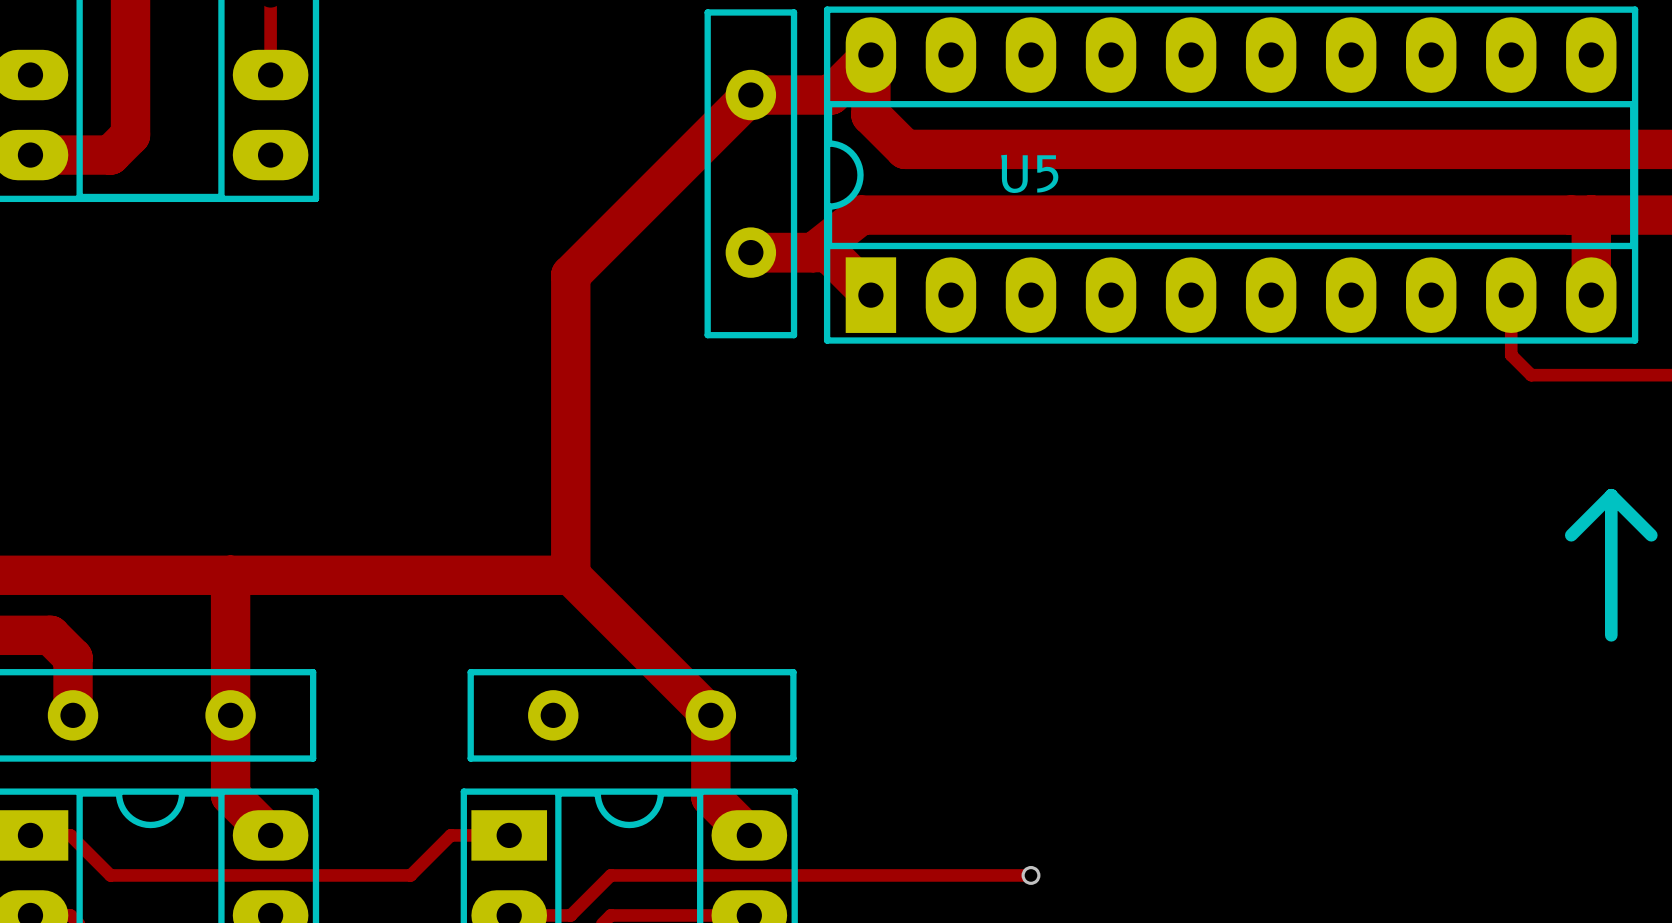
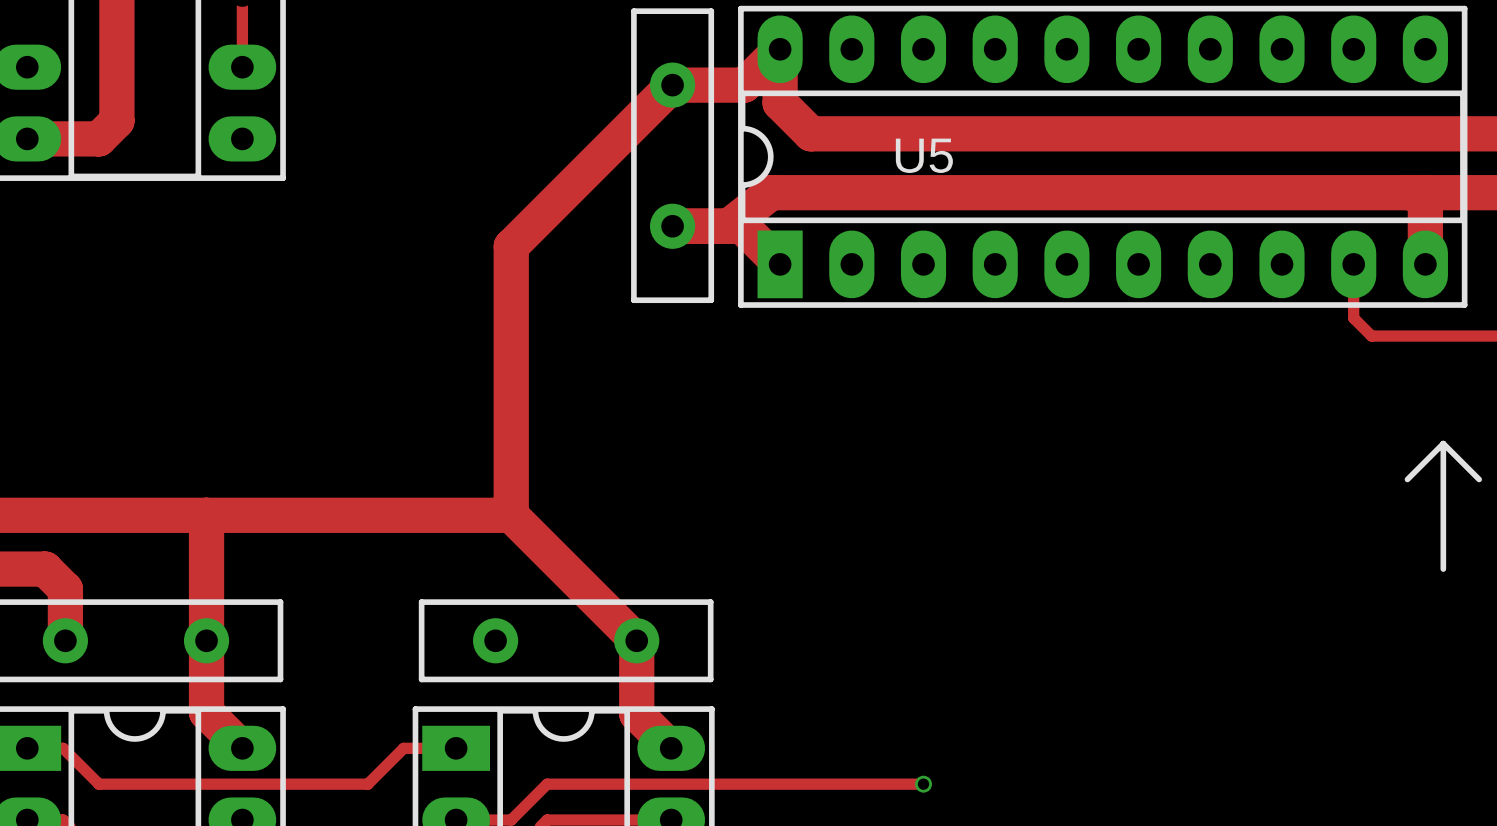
line width: thick (1611, 495) (1651, 535) -> thin (1443, 443) (1479, 479)
line width: thick (1611, 495) (1571, 535) -> thin (1443, 443) (1407, 479)
line width: thick (1611, 495) (1611, 635) -> thin (1443, 443) (1443, 569)

